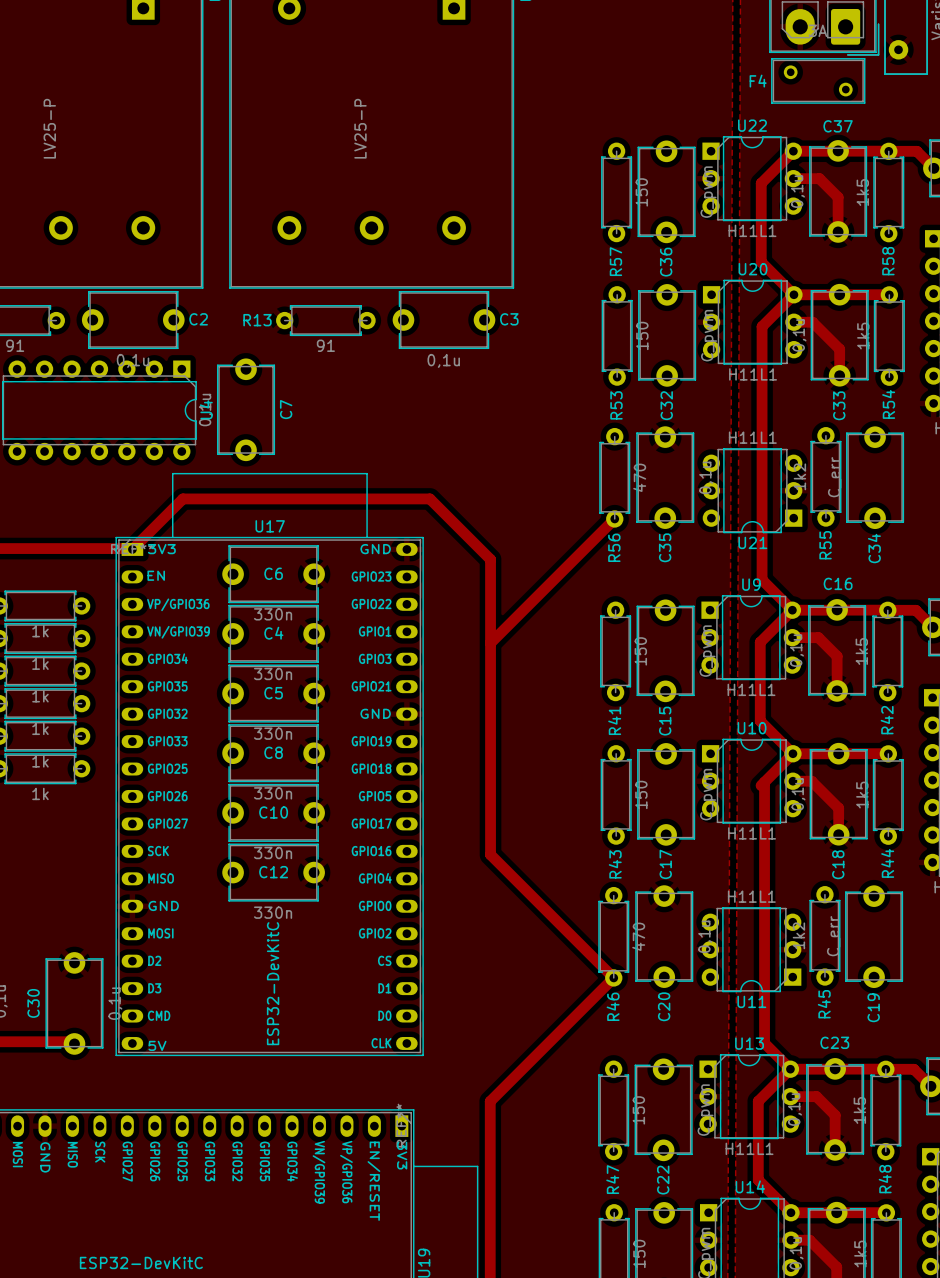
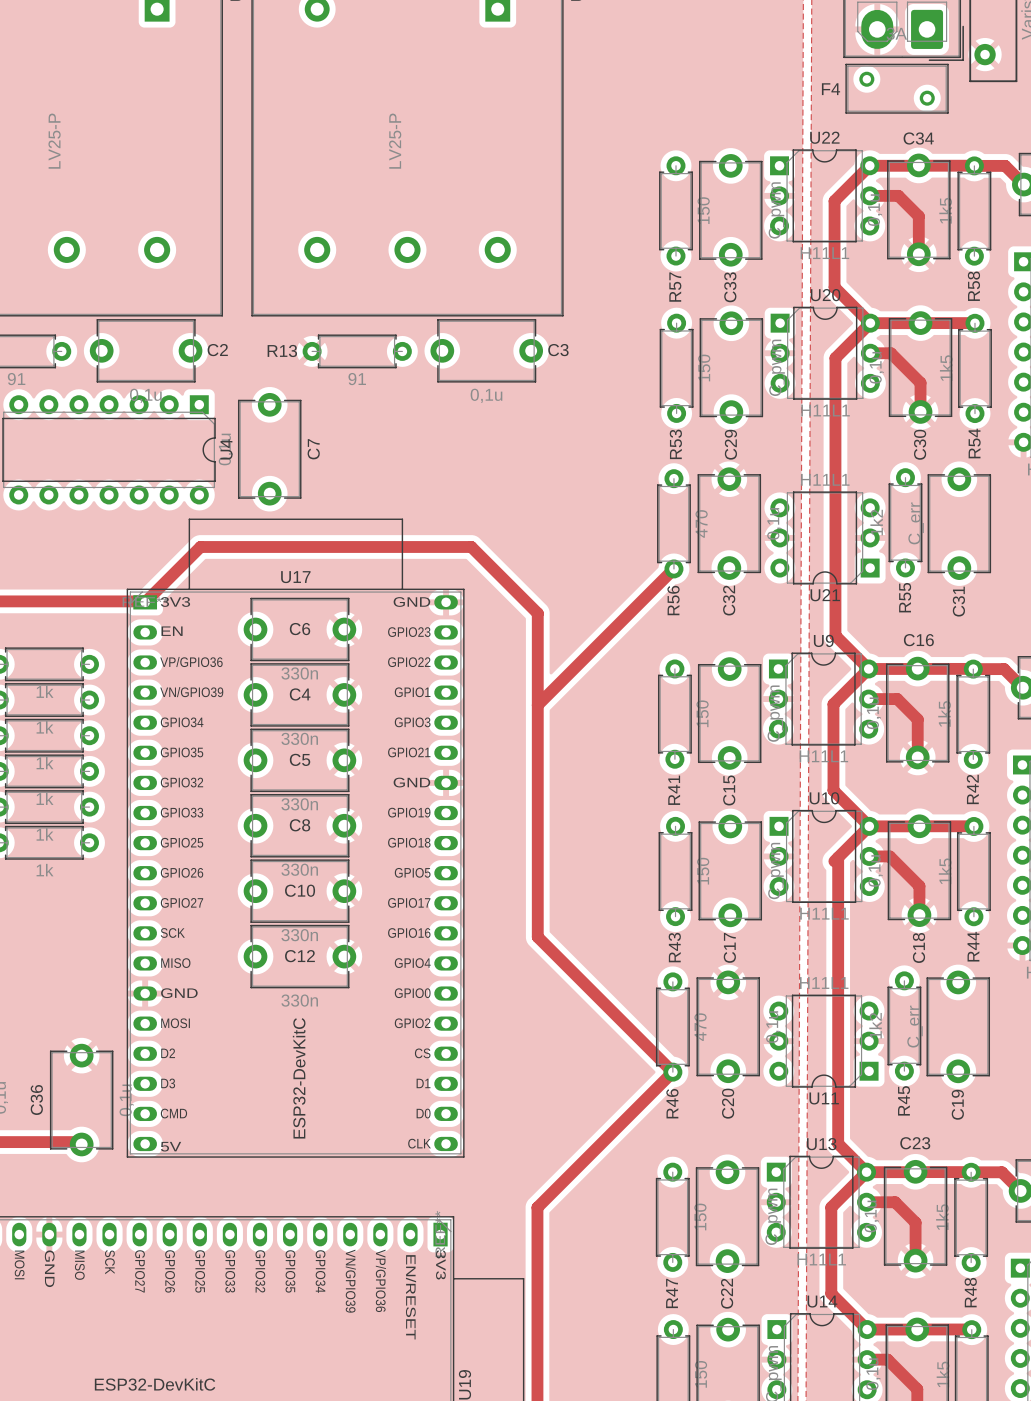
C37 name: C37 (838, 126) -> C34 (918, 138)
C36 name: C36 (666, 262) -> C33 (730, 287)
C32 name: C32 (666, 405) -> C29 (730, 444)
C33 name: C33 (839, 405) -> C30 (920, 444)
C35 name: C35 (665, 547) -> C32 (729, 600)
C34 name: C34 (874, 548) -> C31 (958, 601)
C30 name: C30 (33, 1003) -> C36 (36, 1100)

